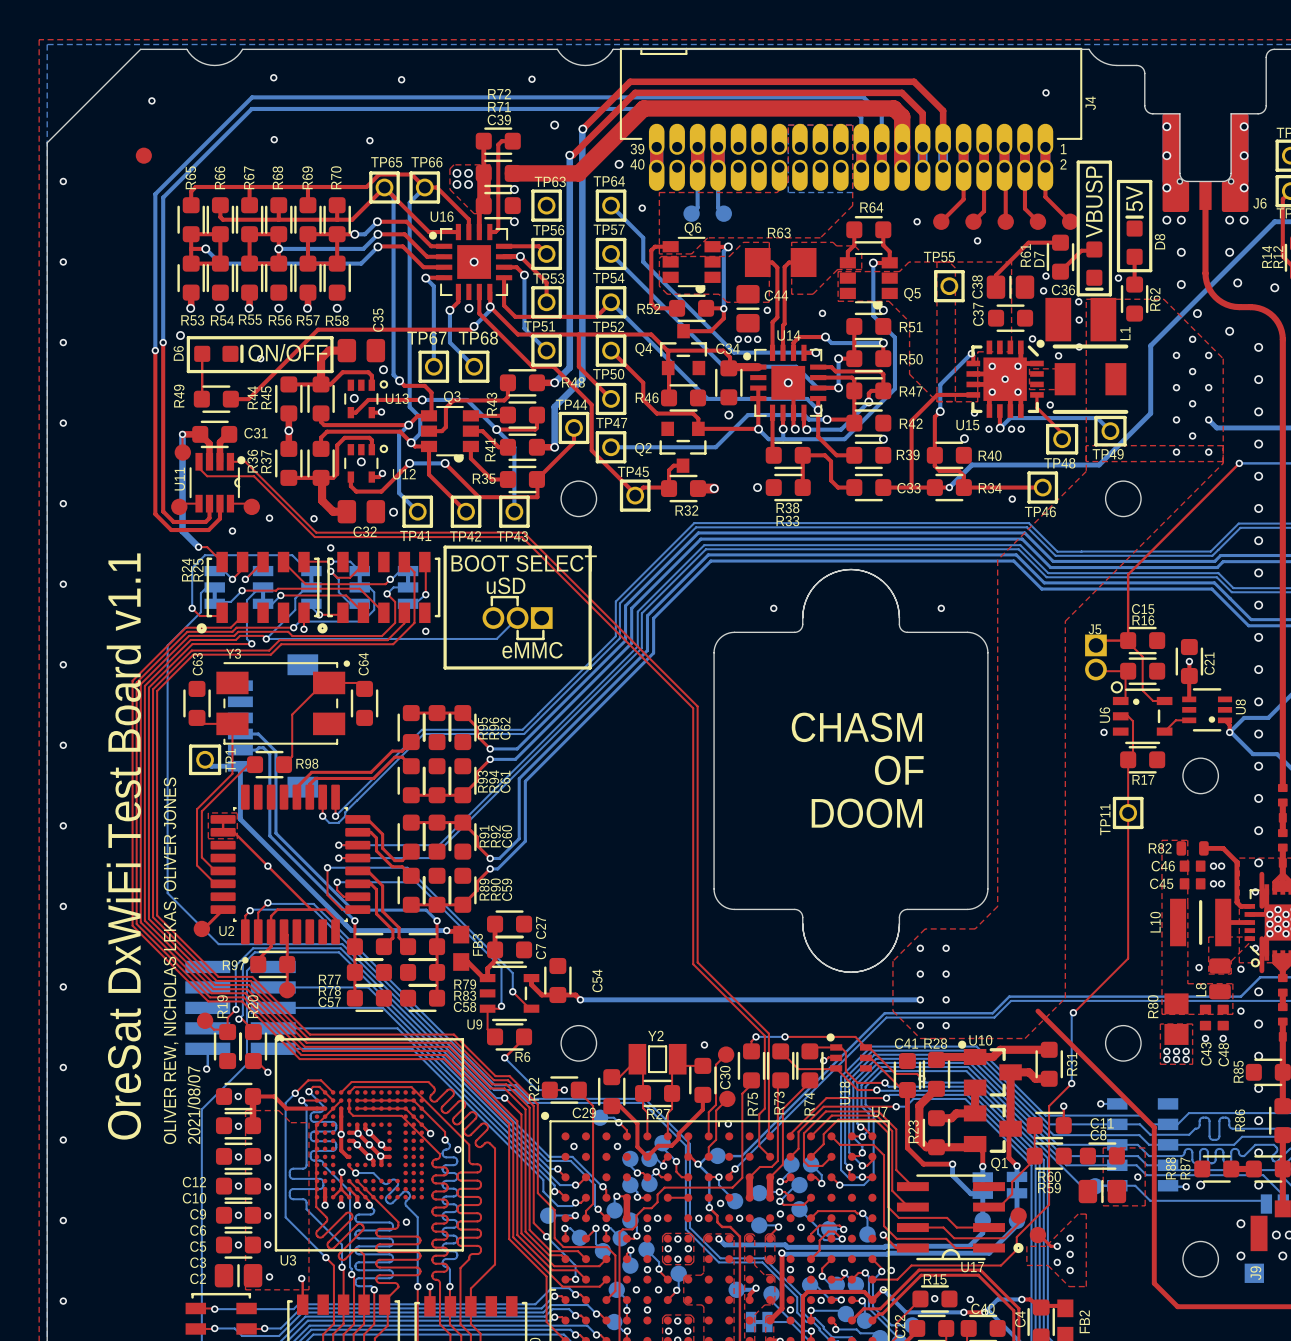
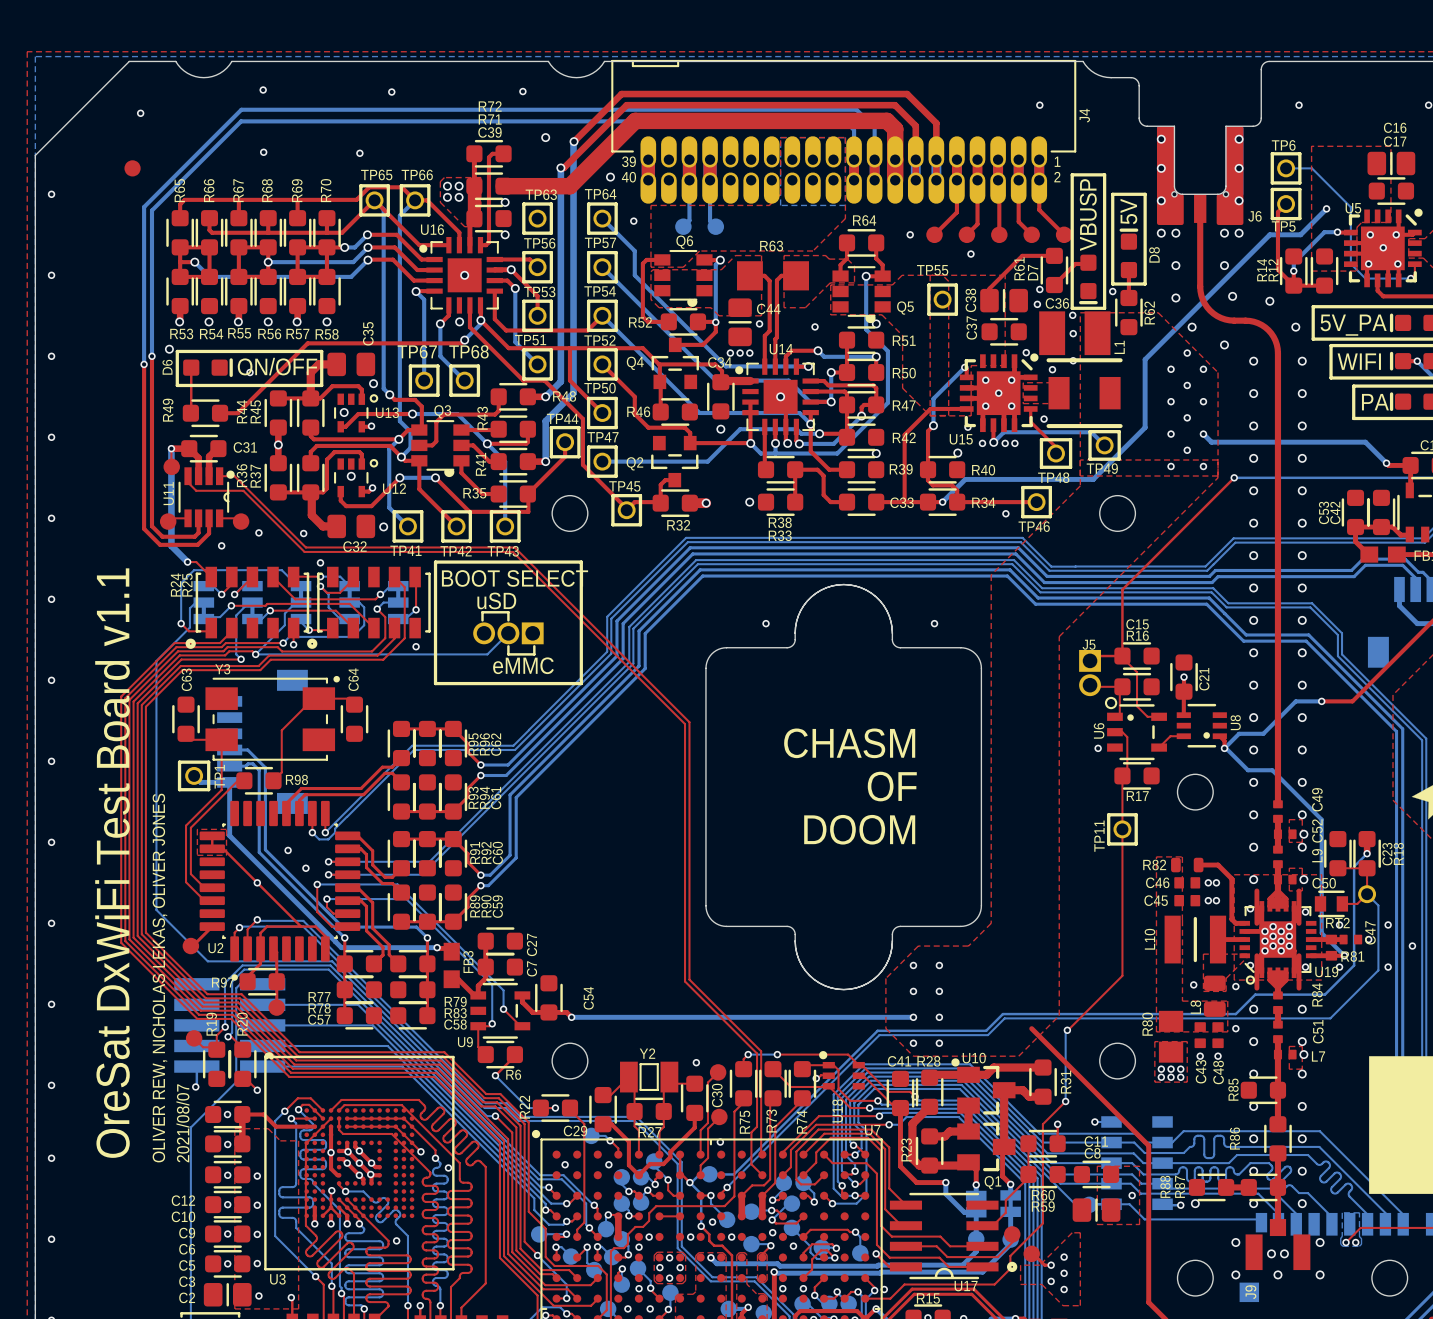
via: none -> (288, 850)
via: none -> (305, 868)

